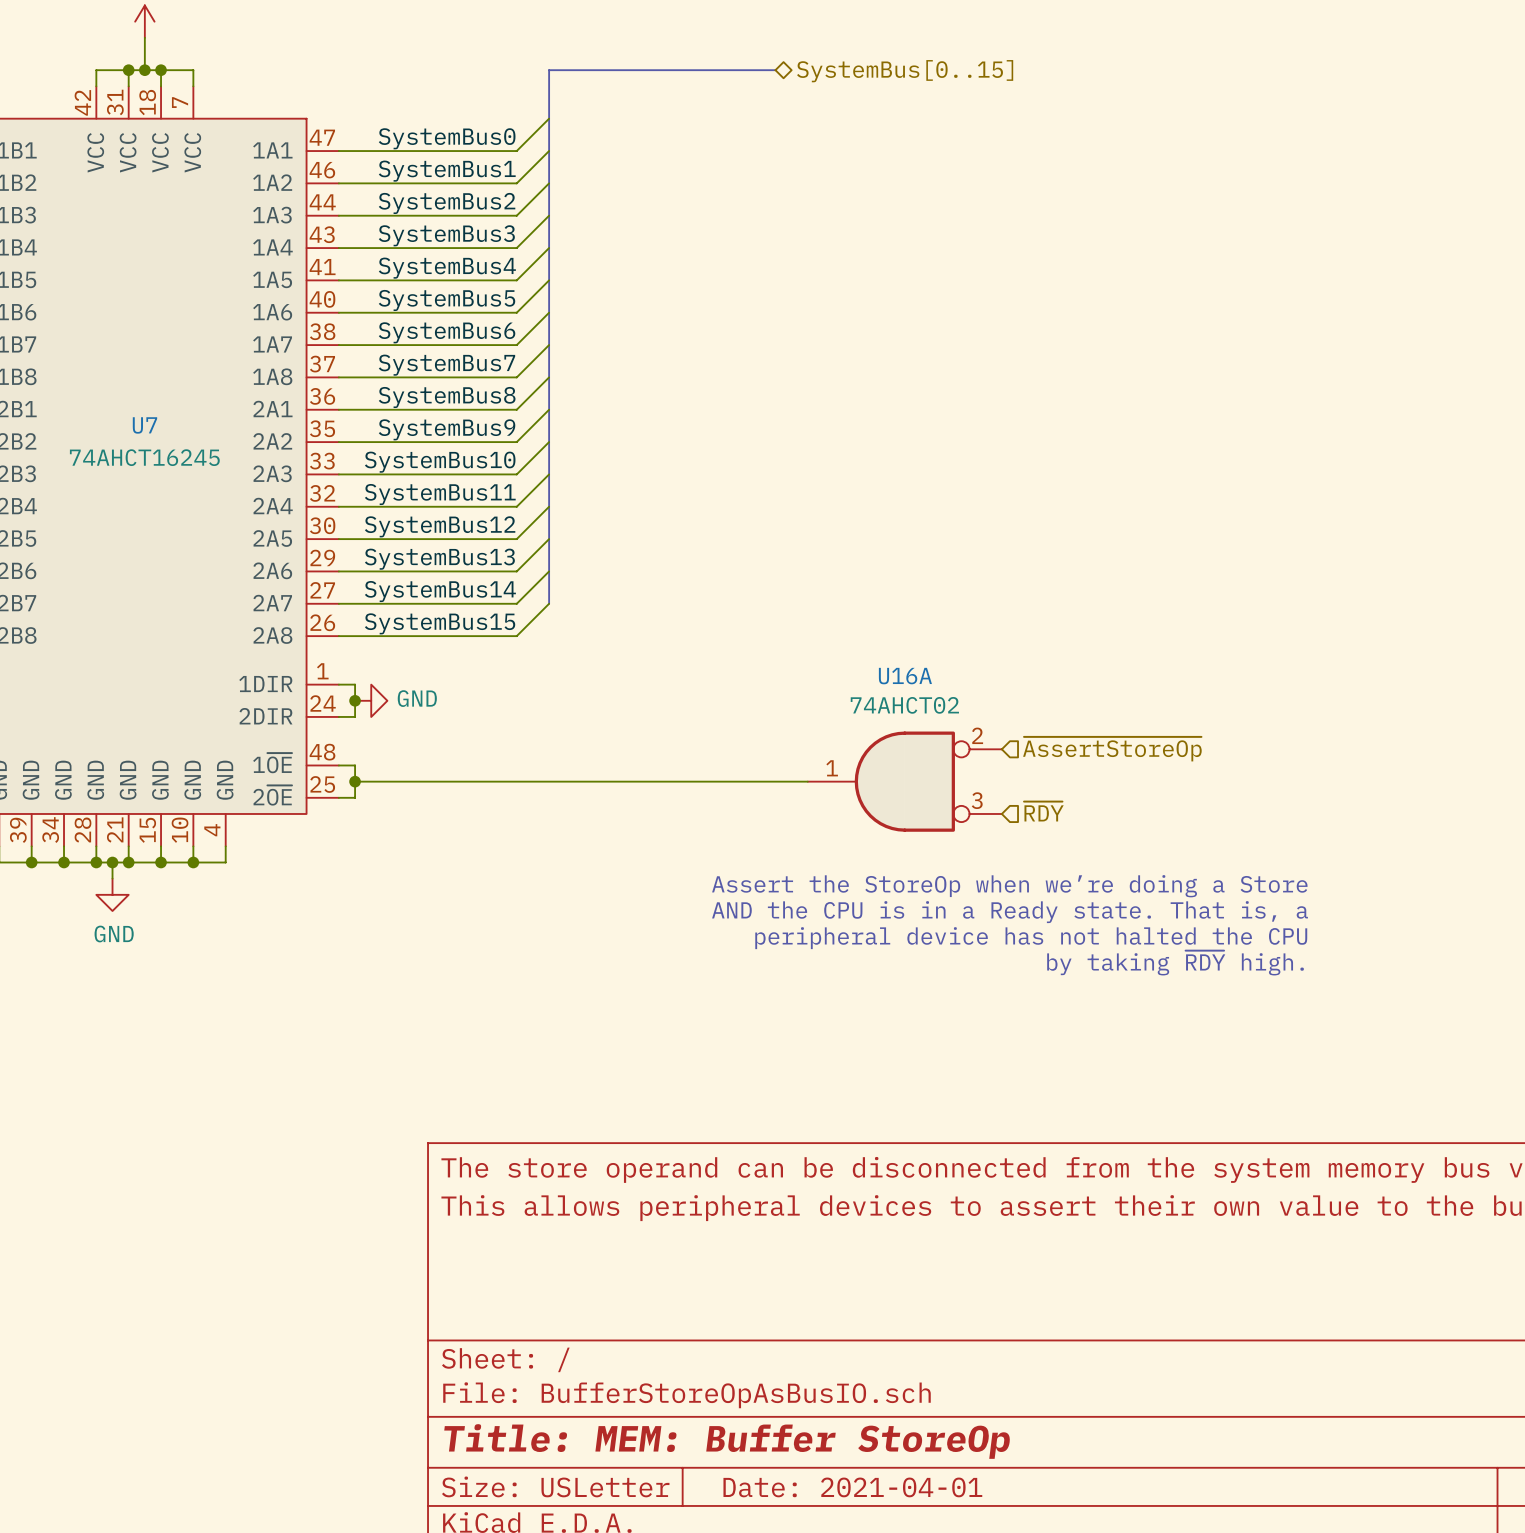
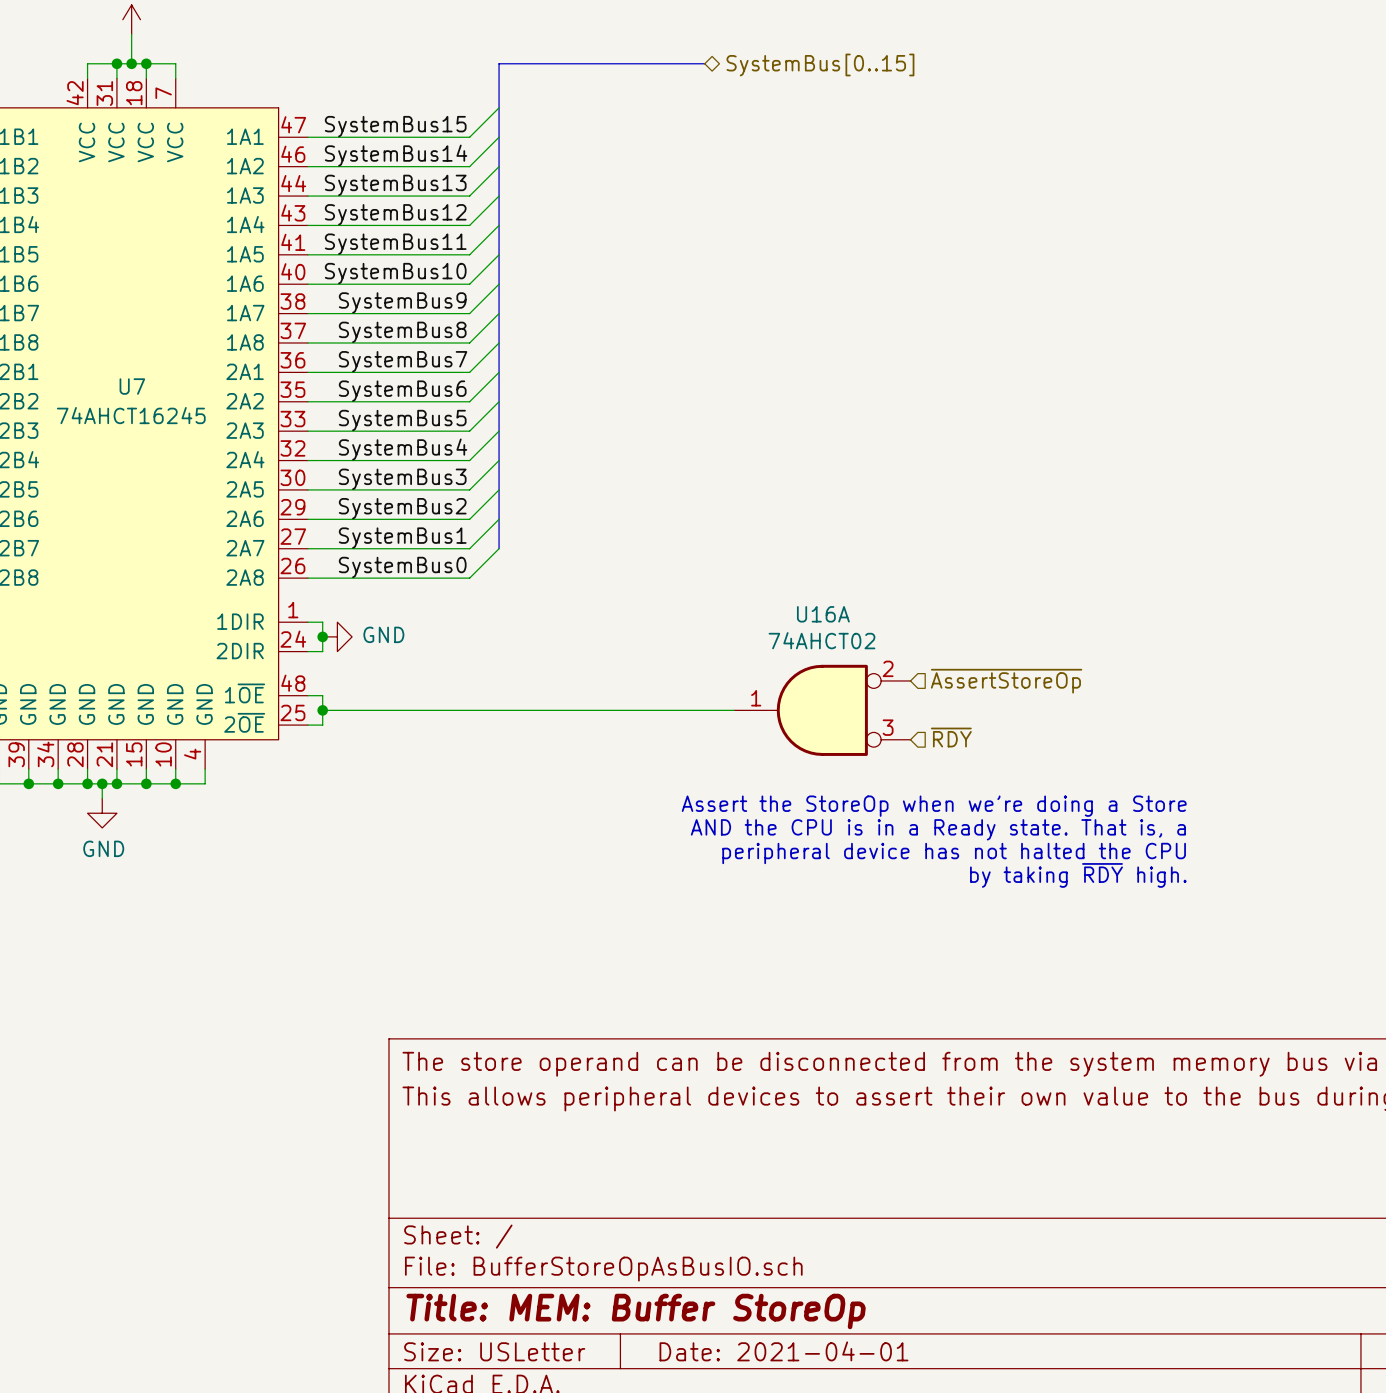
label: SystemBus0 (447, 138) -> SystemBus15 (395, 126)
label: SystemBus1 (447, 171) -> SystemBus14 (396, 155)
label: SystemBus2 (447, 203) -> SystemBus13 (395, 185)
label: SystemBus3 (446, 235) -> SystemBus12 (395, 214)
label: SystemBus4 (447, 268) -> SystemBus11 (395, 244)
label: SystemBus5 (447, 300) -> SystemBus10 (395, 273)
label: SystemBus6 (447, 332) -> SystemBus9 (402, 302)
label: SystemBus7 (446, 365) -> SystemBus8 (402, 332)
label: SystemBus8 (447, 397) -> SystemBus7 (403, 361)
label: SystemBus9 (447, 429) -> SystemBus6 (402, 391)
label: SystemBus10 (440, 462) -> SystemBus5 (402, 420)
label: SystemBus11 (440, 494) -> SystemBus4 (403, 449)
label: SystemBus12 (440, 526) -> SystemBus3 (402, 479)
label: SystemBus13 (439, 559) -> SystemBus2 (402, 508)
label: SystemBus14 (440, 591) -> SystemBus1 (402, 538)
label: SystemBus15 (440, 623) -> SystemBus0 (402, 567)

